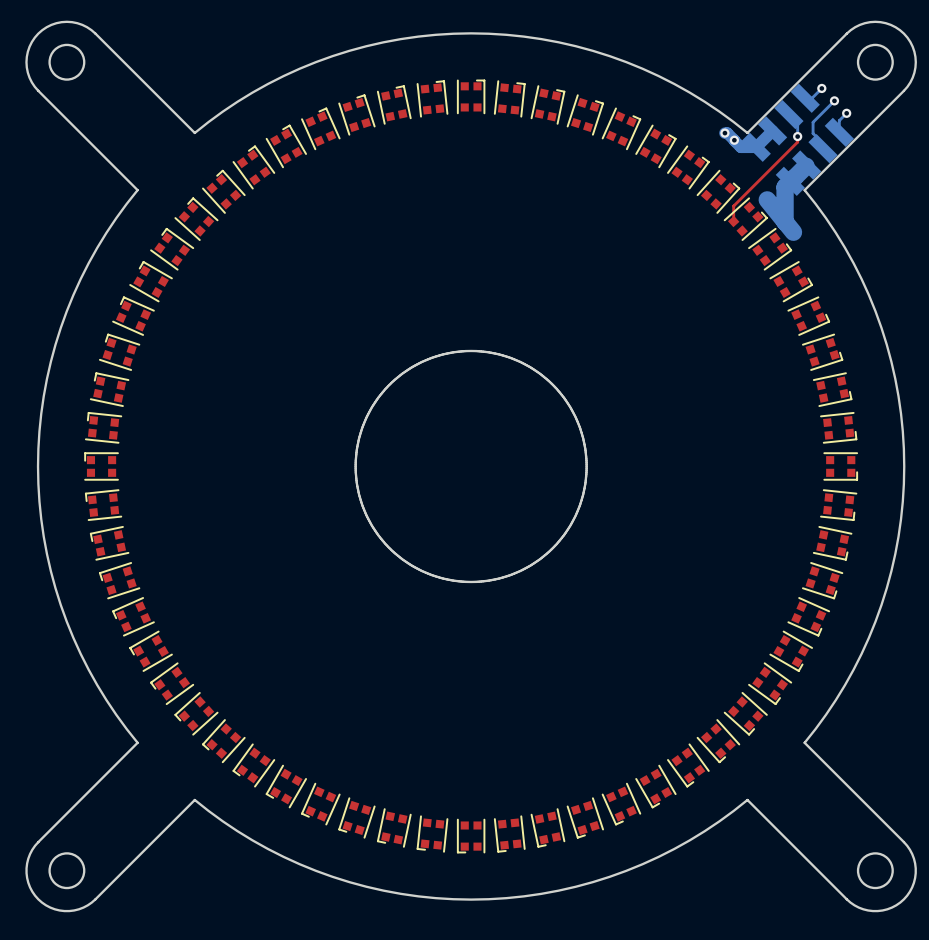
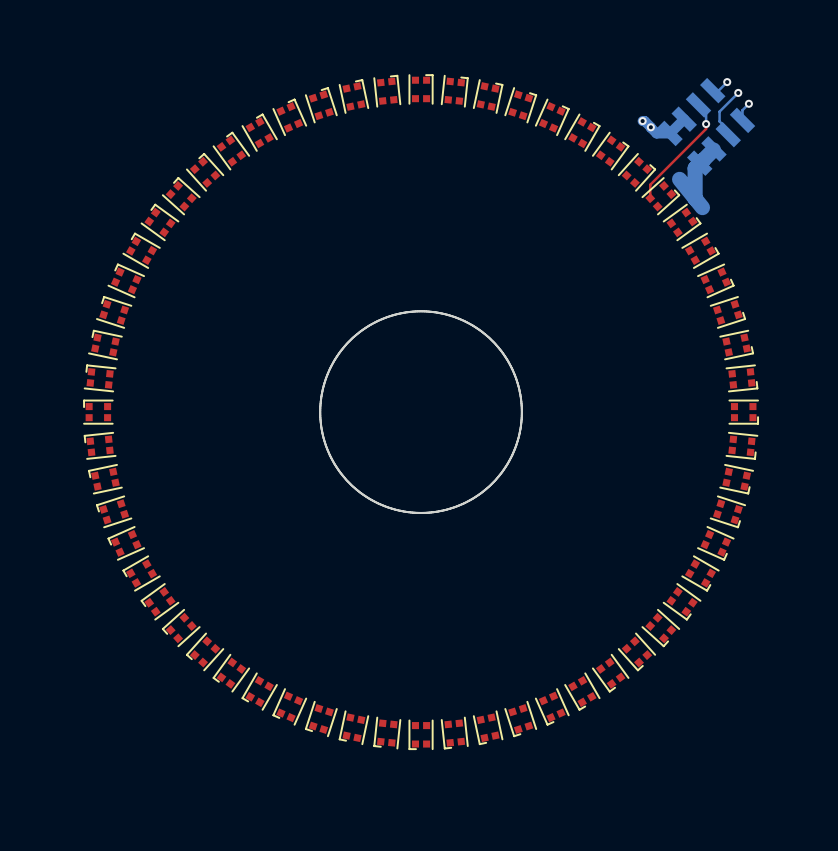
board edge: (95, 33) (194, 132) (252, 92) (316, 62) (383, 42) (418, 36) (471, 33) (541, 39) (609, 56) (674, 84) (704, 101) (747, 132) (855, 27) (864, 23) (880, 22) (890, 24) (903, 33) (912, 46) (915, 56) (914, 72) (910, 82) (804, 190) (845, 247) (861, 278) (881, 327) (898, 396) (904, 466) (898, 536) (881, 605) (853, 669) (826, 714) (804, 742) (909, 849) (913, 858) (915, 873) (912, 887) (903, 899) (896, 905) (882, 910) (868, 910) (854, 905) (747, 799) (704, 831) (674, 848) (609, 876) (541, 893) (471, 899) (400, 893) (349, 882) (316, 870) (252, 840) (194, 799) (87, 905) (78, 909) (64, 911) (50, 907) (38, 899) (30, 887) (27, 878) (27, 863) (32, 849) (137, 742) (97, 685) (66, 621) (46, 554) (38, 484) (41, 413) (46, 378) (60, 327) (88, 263) (106, 232) (137, 190) (34, 86) (27, 72) (26, 56) (31, 42) (38, 33) (56, 23) (77, 23) (95, 33) -> none
round board edge: [48, 43, 86, 81] -> none
round board edge: [856, 43, 894, 81] -> none
round board edge: [48, 852, 86, 890] -> none
round board edge: [856, 852, 894, 890] -> none

